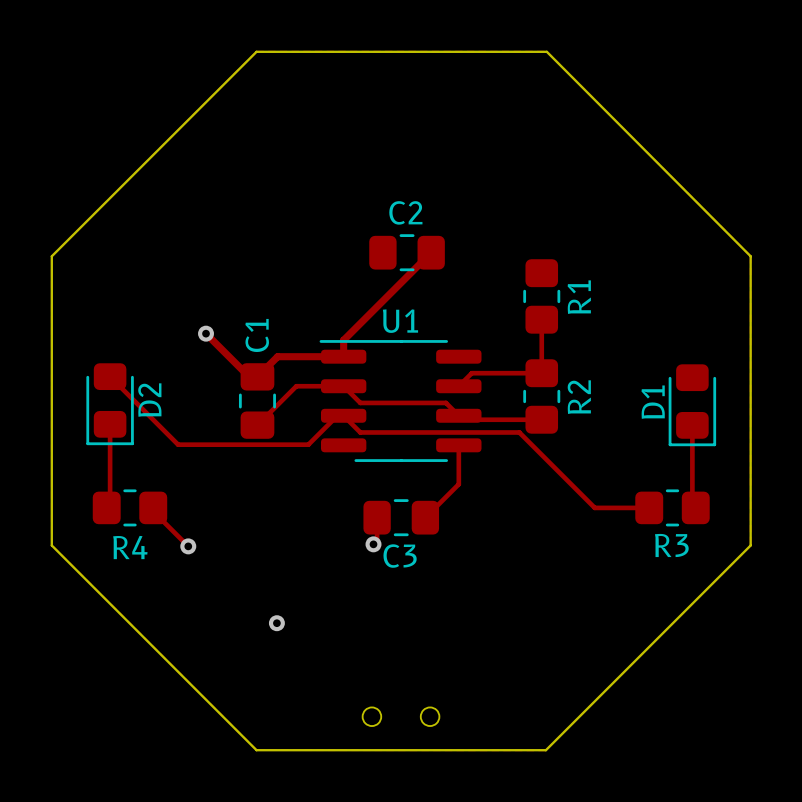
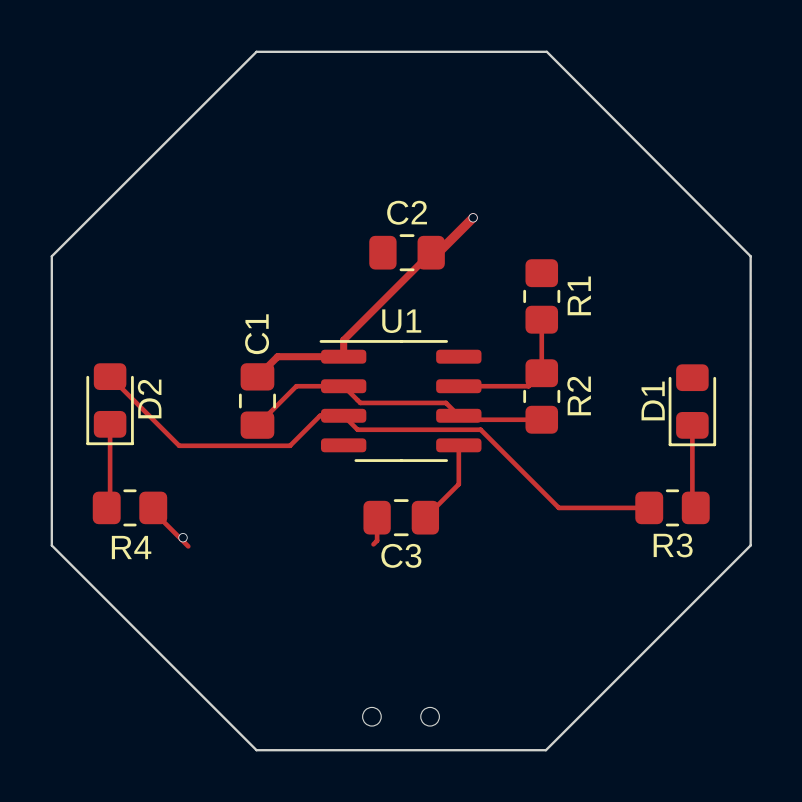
track: none -> (473, 217) (438, 252) (431, 252)
via: none -> (473, 217)
track: (206, 333) (249, 376) (257, 376) -> none
via: (206, 333) -> none
track: (541, 373) (471, 373) (458, 386) -> (541, 373) (528, 386) (458, 386)
track: (337, 415) (308, 444) (178, 444) -> (337, 415) (320, 415) (290, 445) (178, 444)
track: (357, 429) (360, 432) (519, 432) (594, 507) -> (357, 429) (480, 429) (558, 507) (594, 507)
via size: [180, 538, 197, 555] -> [178, 533, 188, 543]
via: (373, 544) -> none
via: (276, 623) -> none

